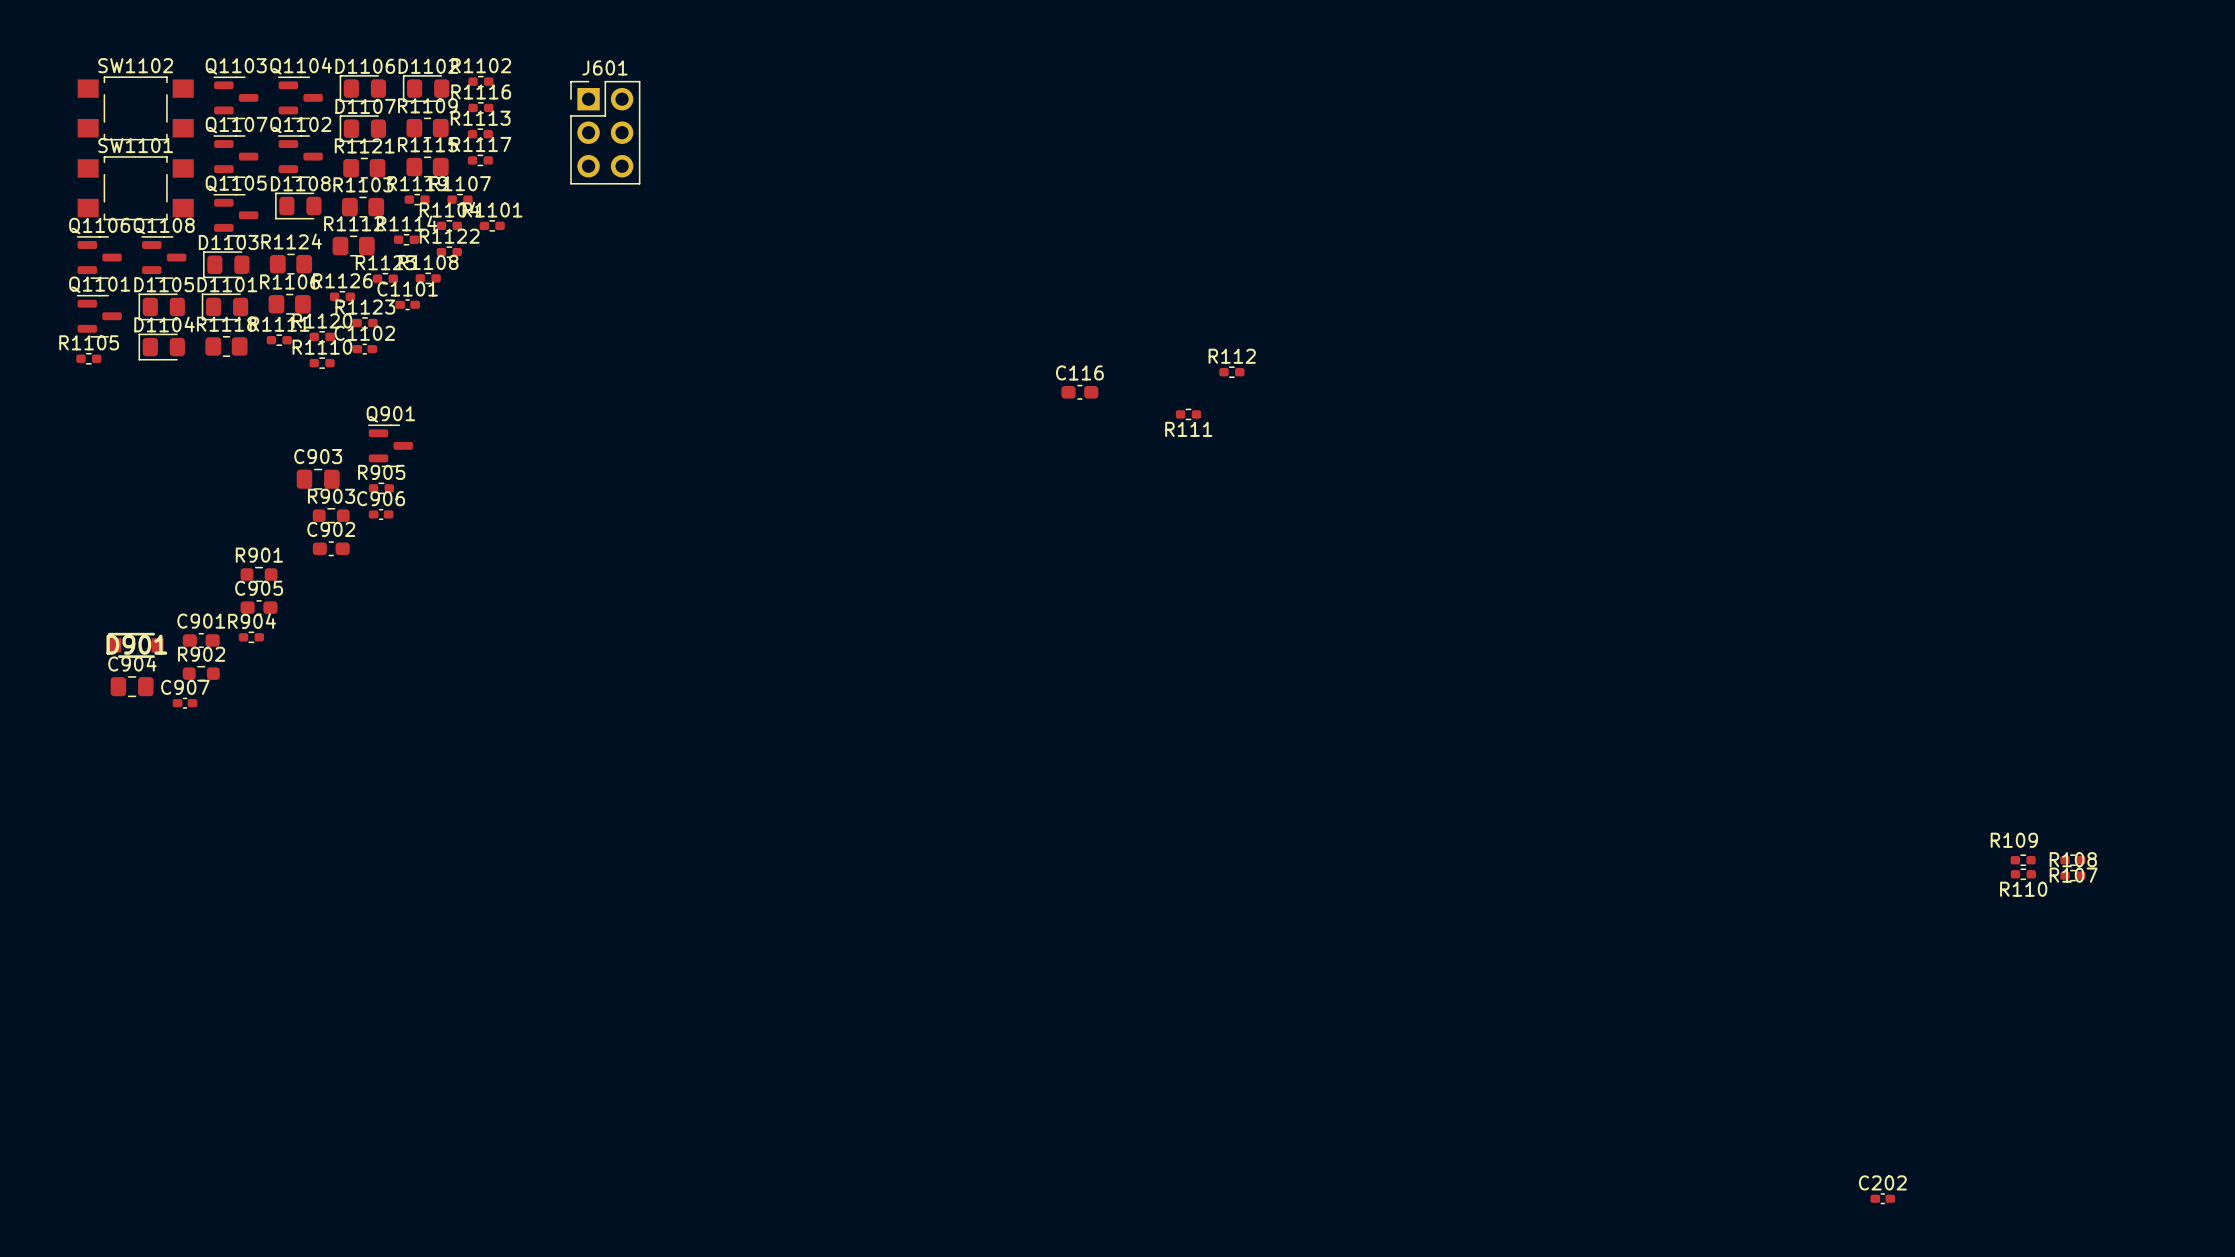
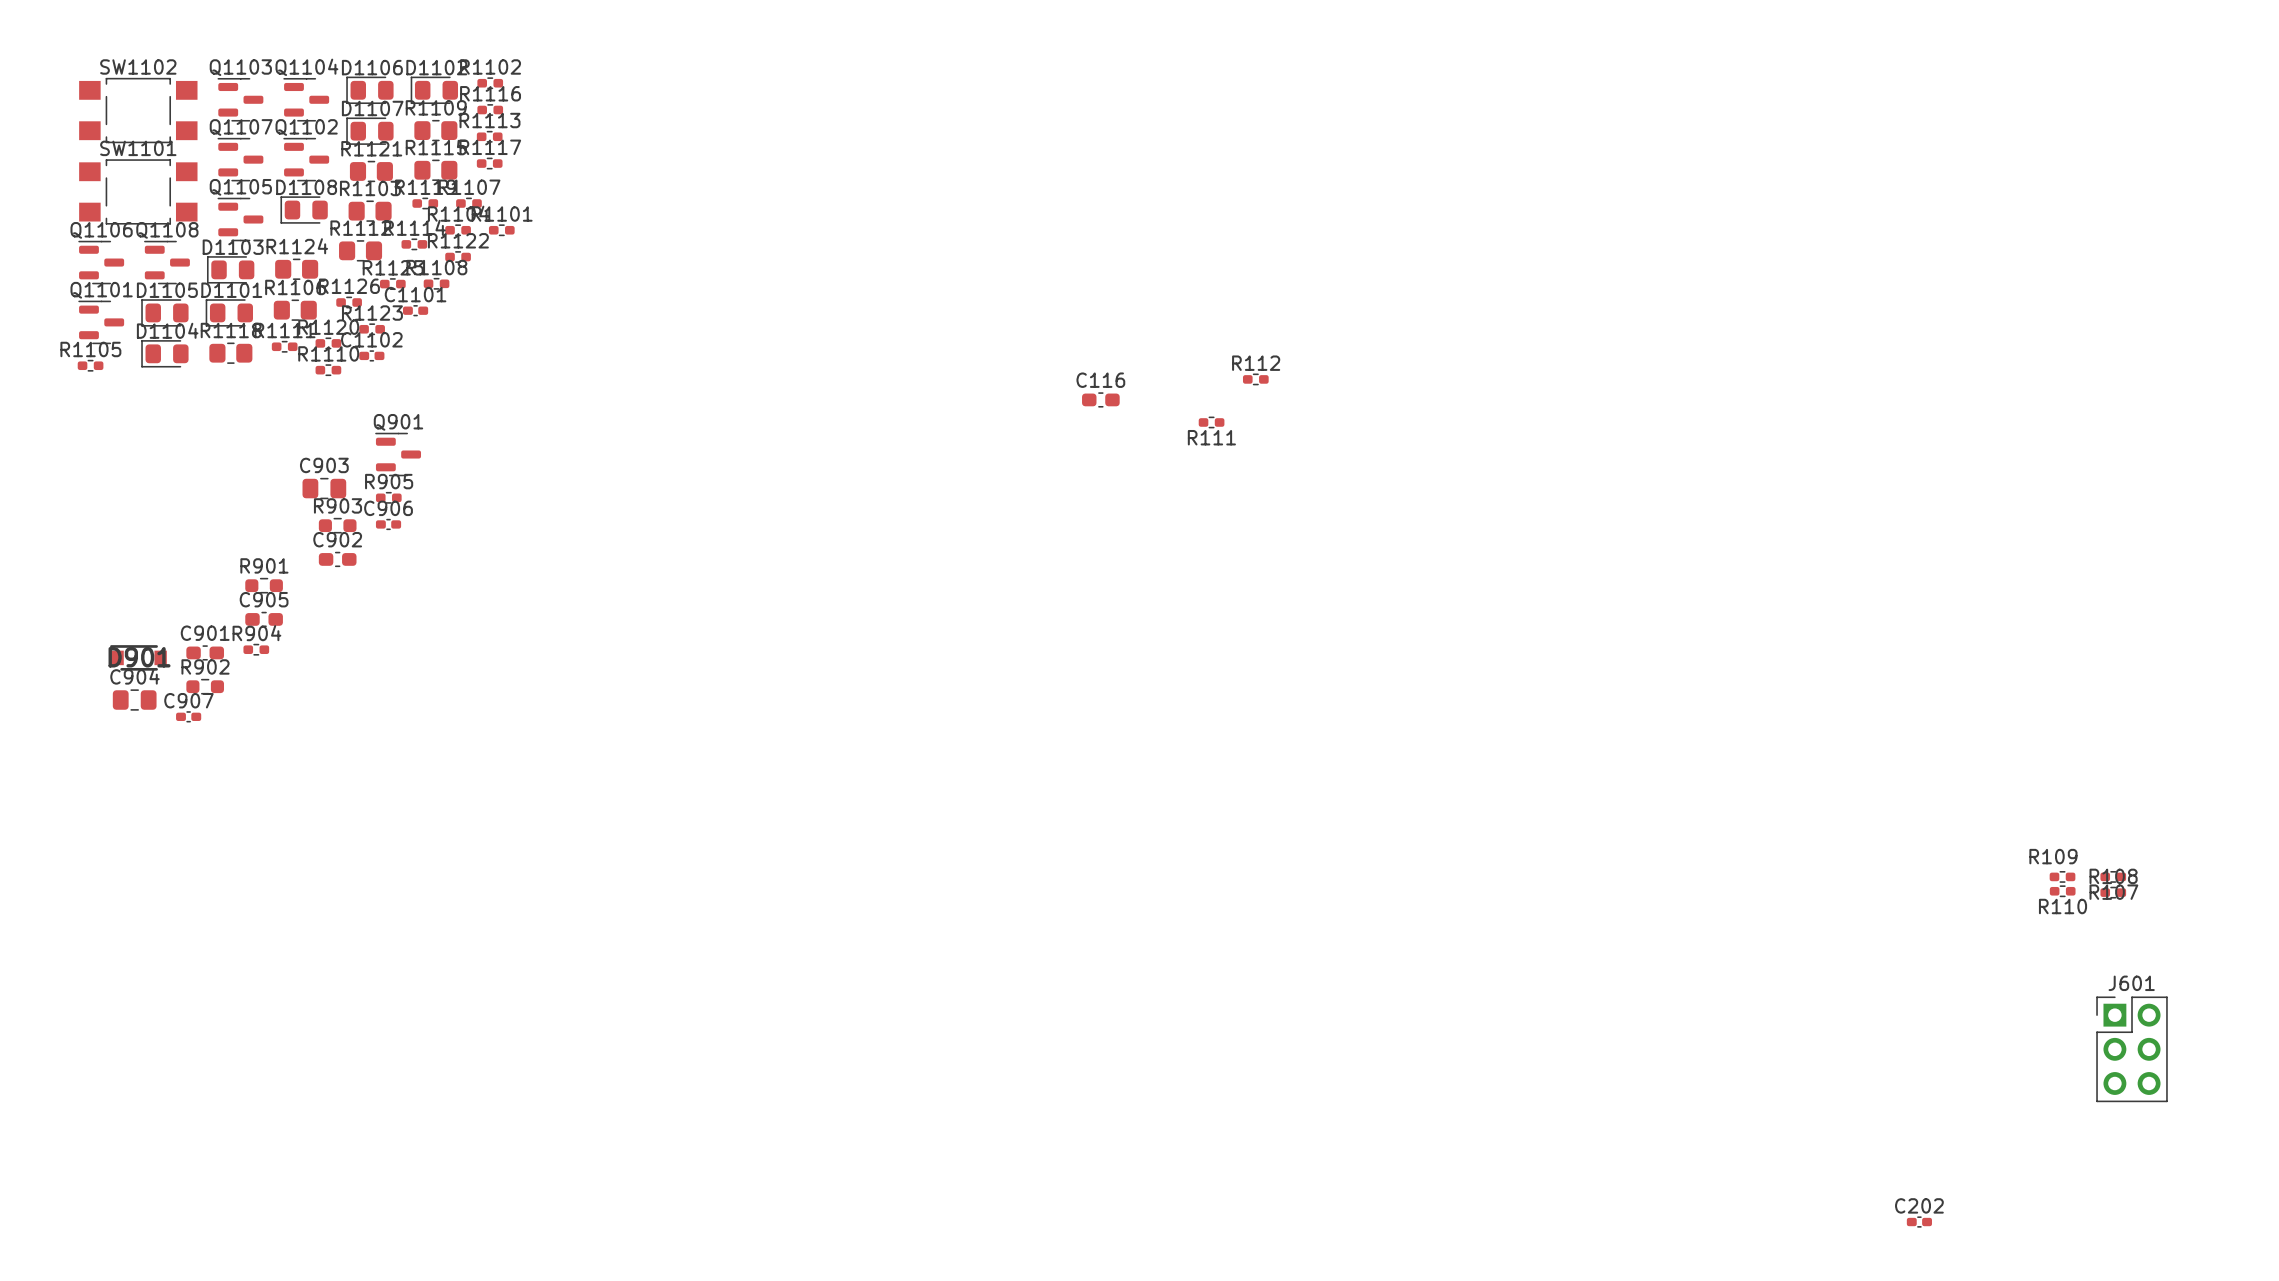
J601 position: (605, 132) -> (2132, 1049)

